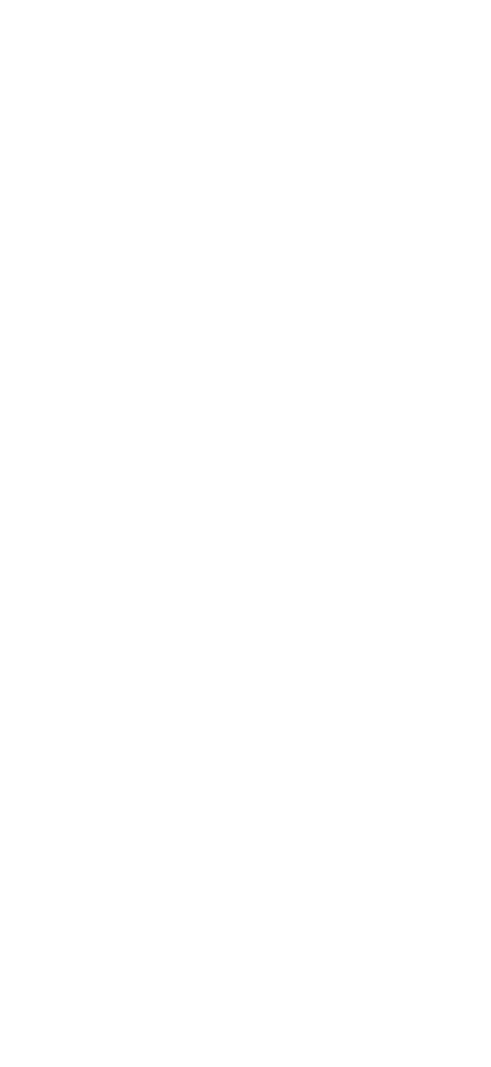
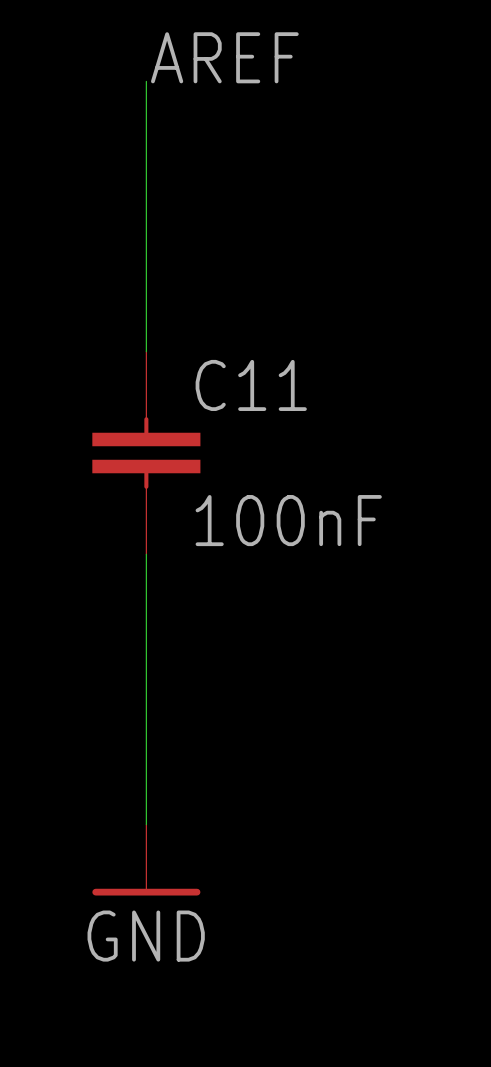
label: none -> AREF (224, 57)
wire: none -> (146, 81) (146, 351)
C11: none -> 100nF (146, 453)
wire: none -> (146, 554) (146, 824)
power symbol: none -> GND (146, 860)

